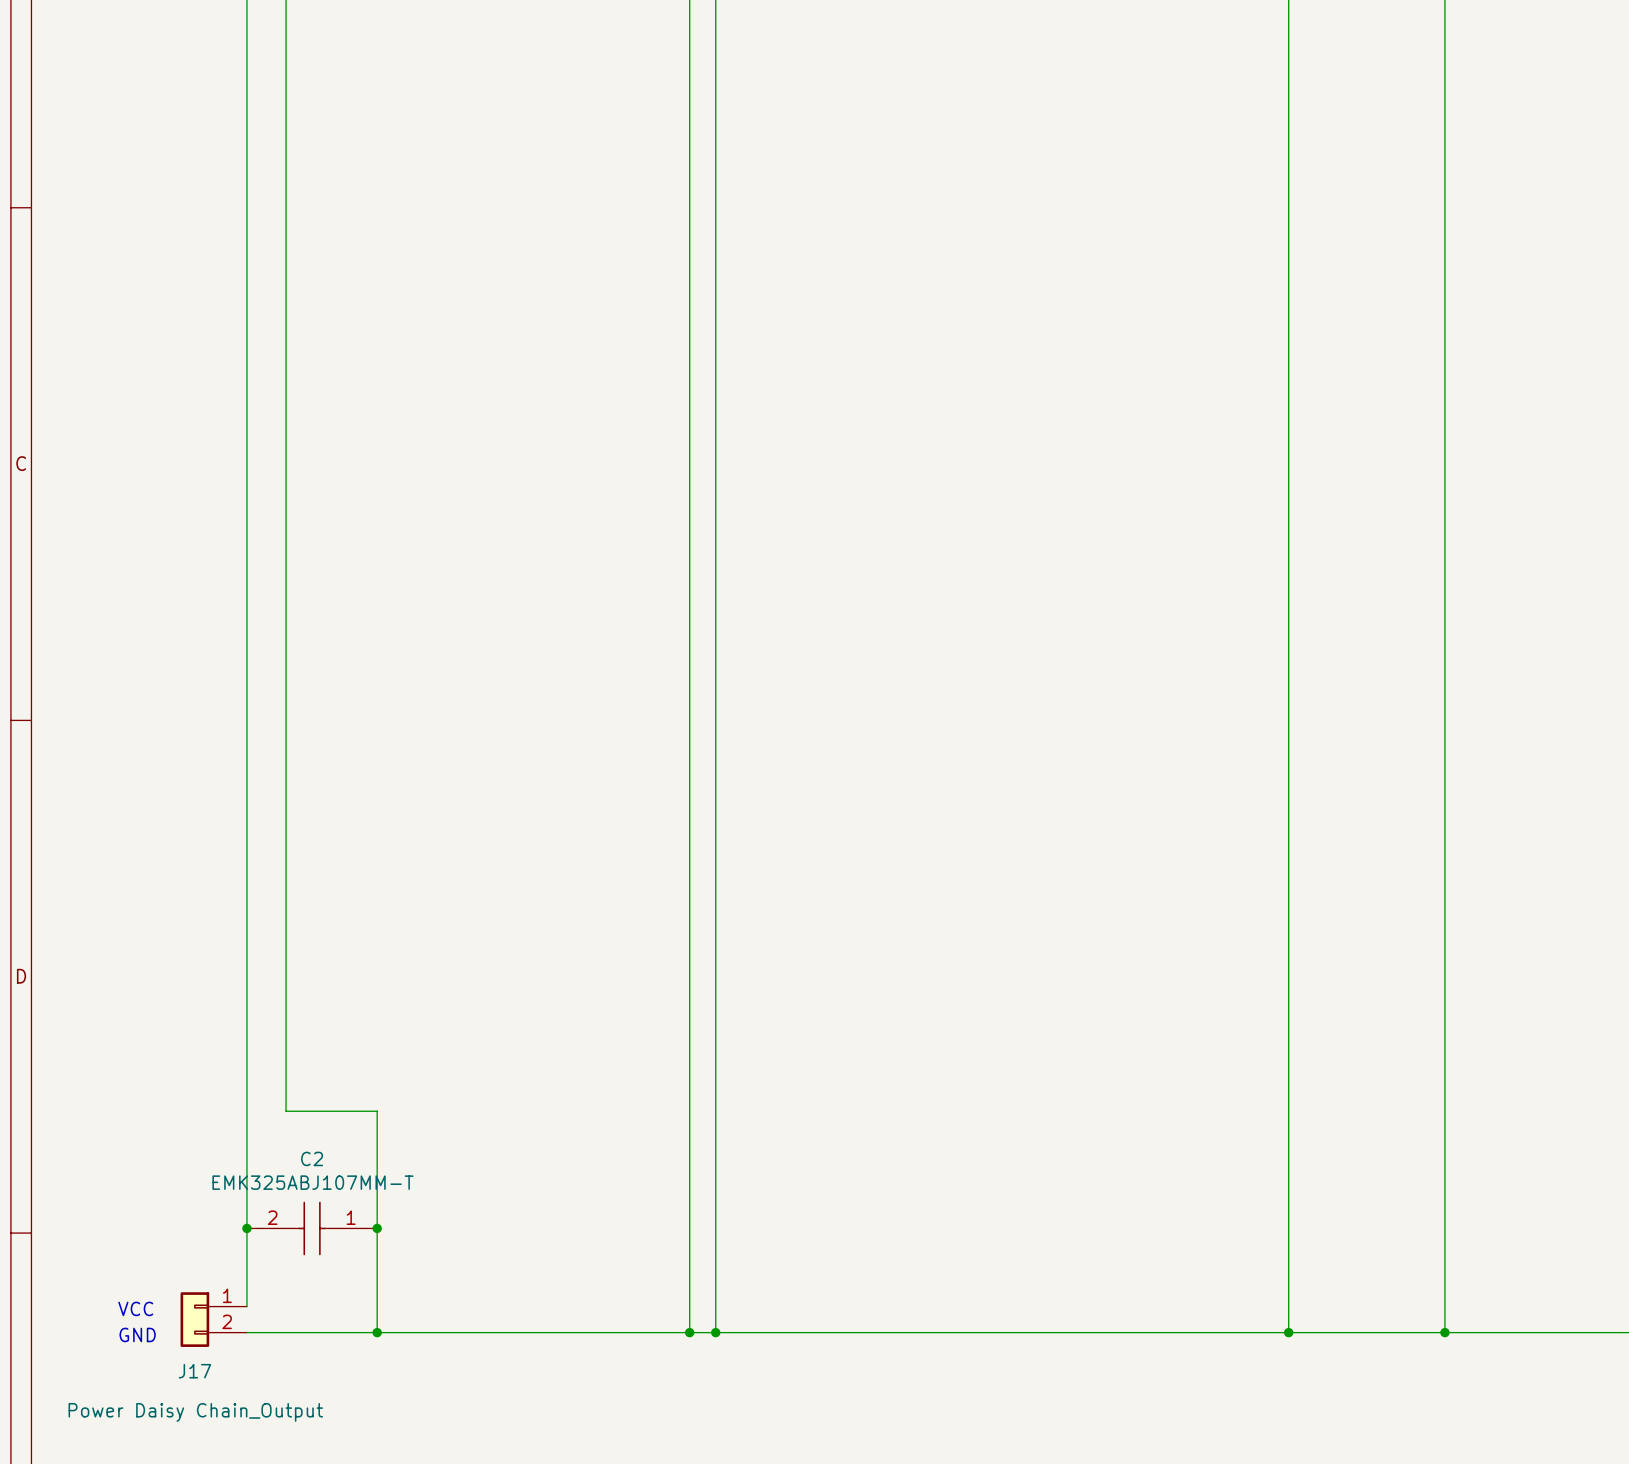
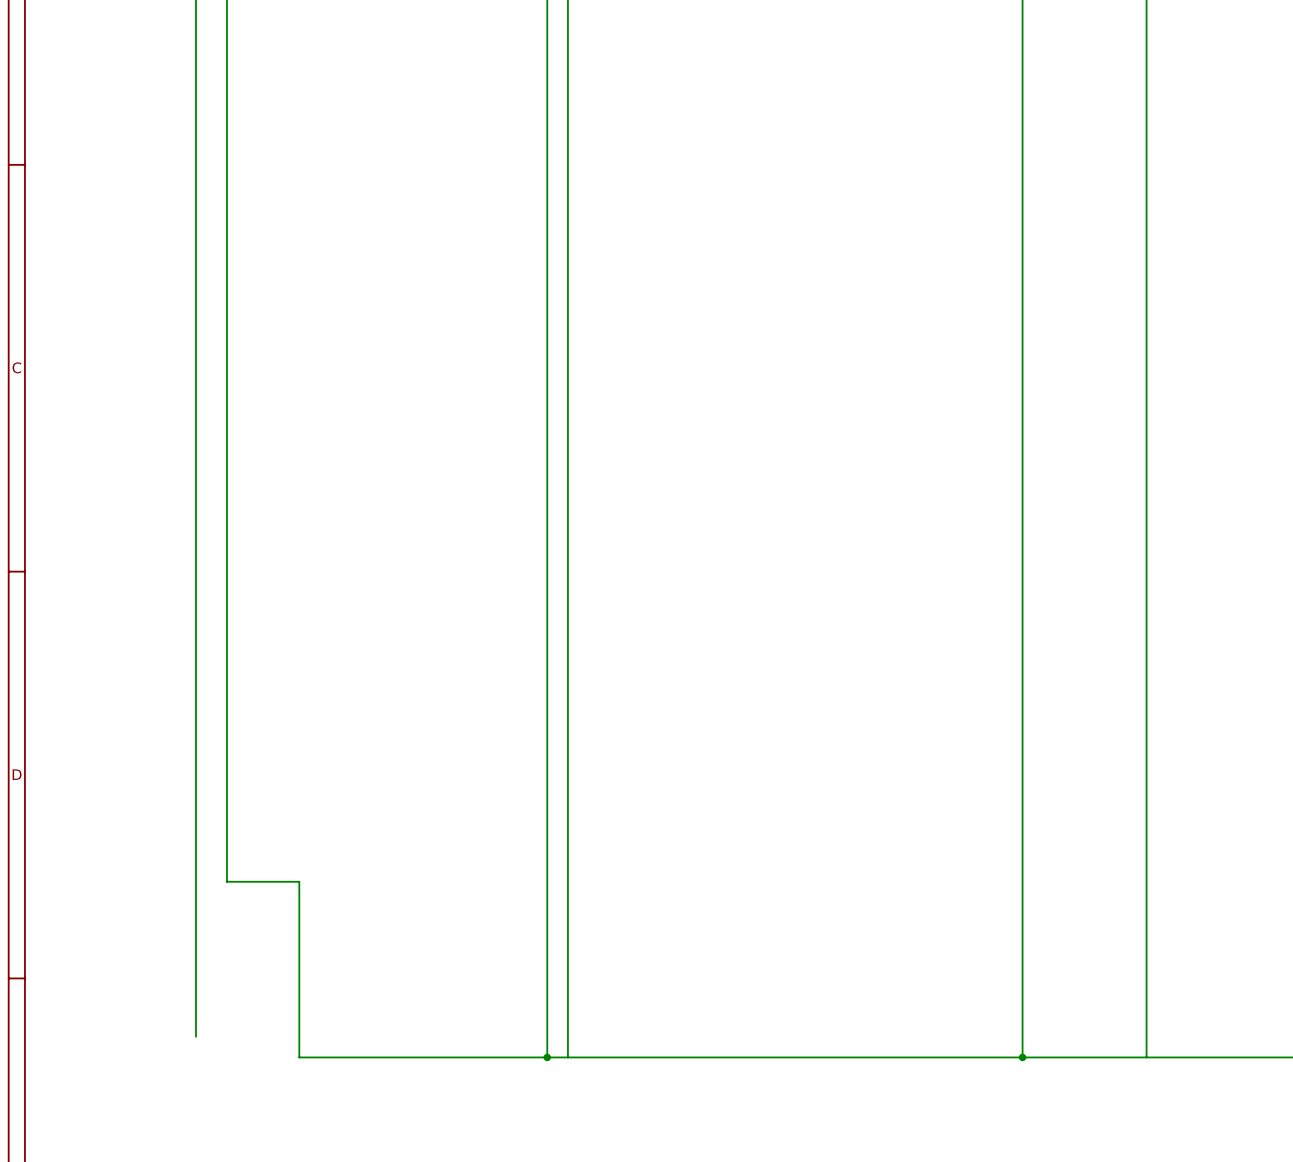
junction: (246, 1228) -> none
C2: EMK325ABJ107MM-T (312, 1228) -> none
junction: (377, 1228) -> none
text: VCC (135, 1308) -> none
J17: Power Daisy Chain_Output (213, 1319) -> none
wire: (246, 1332) (377, 1332) -> none
junction: (377, 1332) -> none
junction: (715, 1332) -> none
junction: (1444, 1332) -> none
text: GND (137, 1334) -> none

